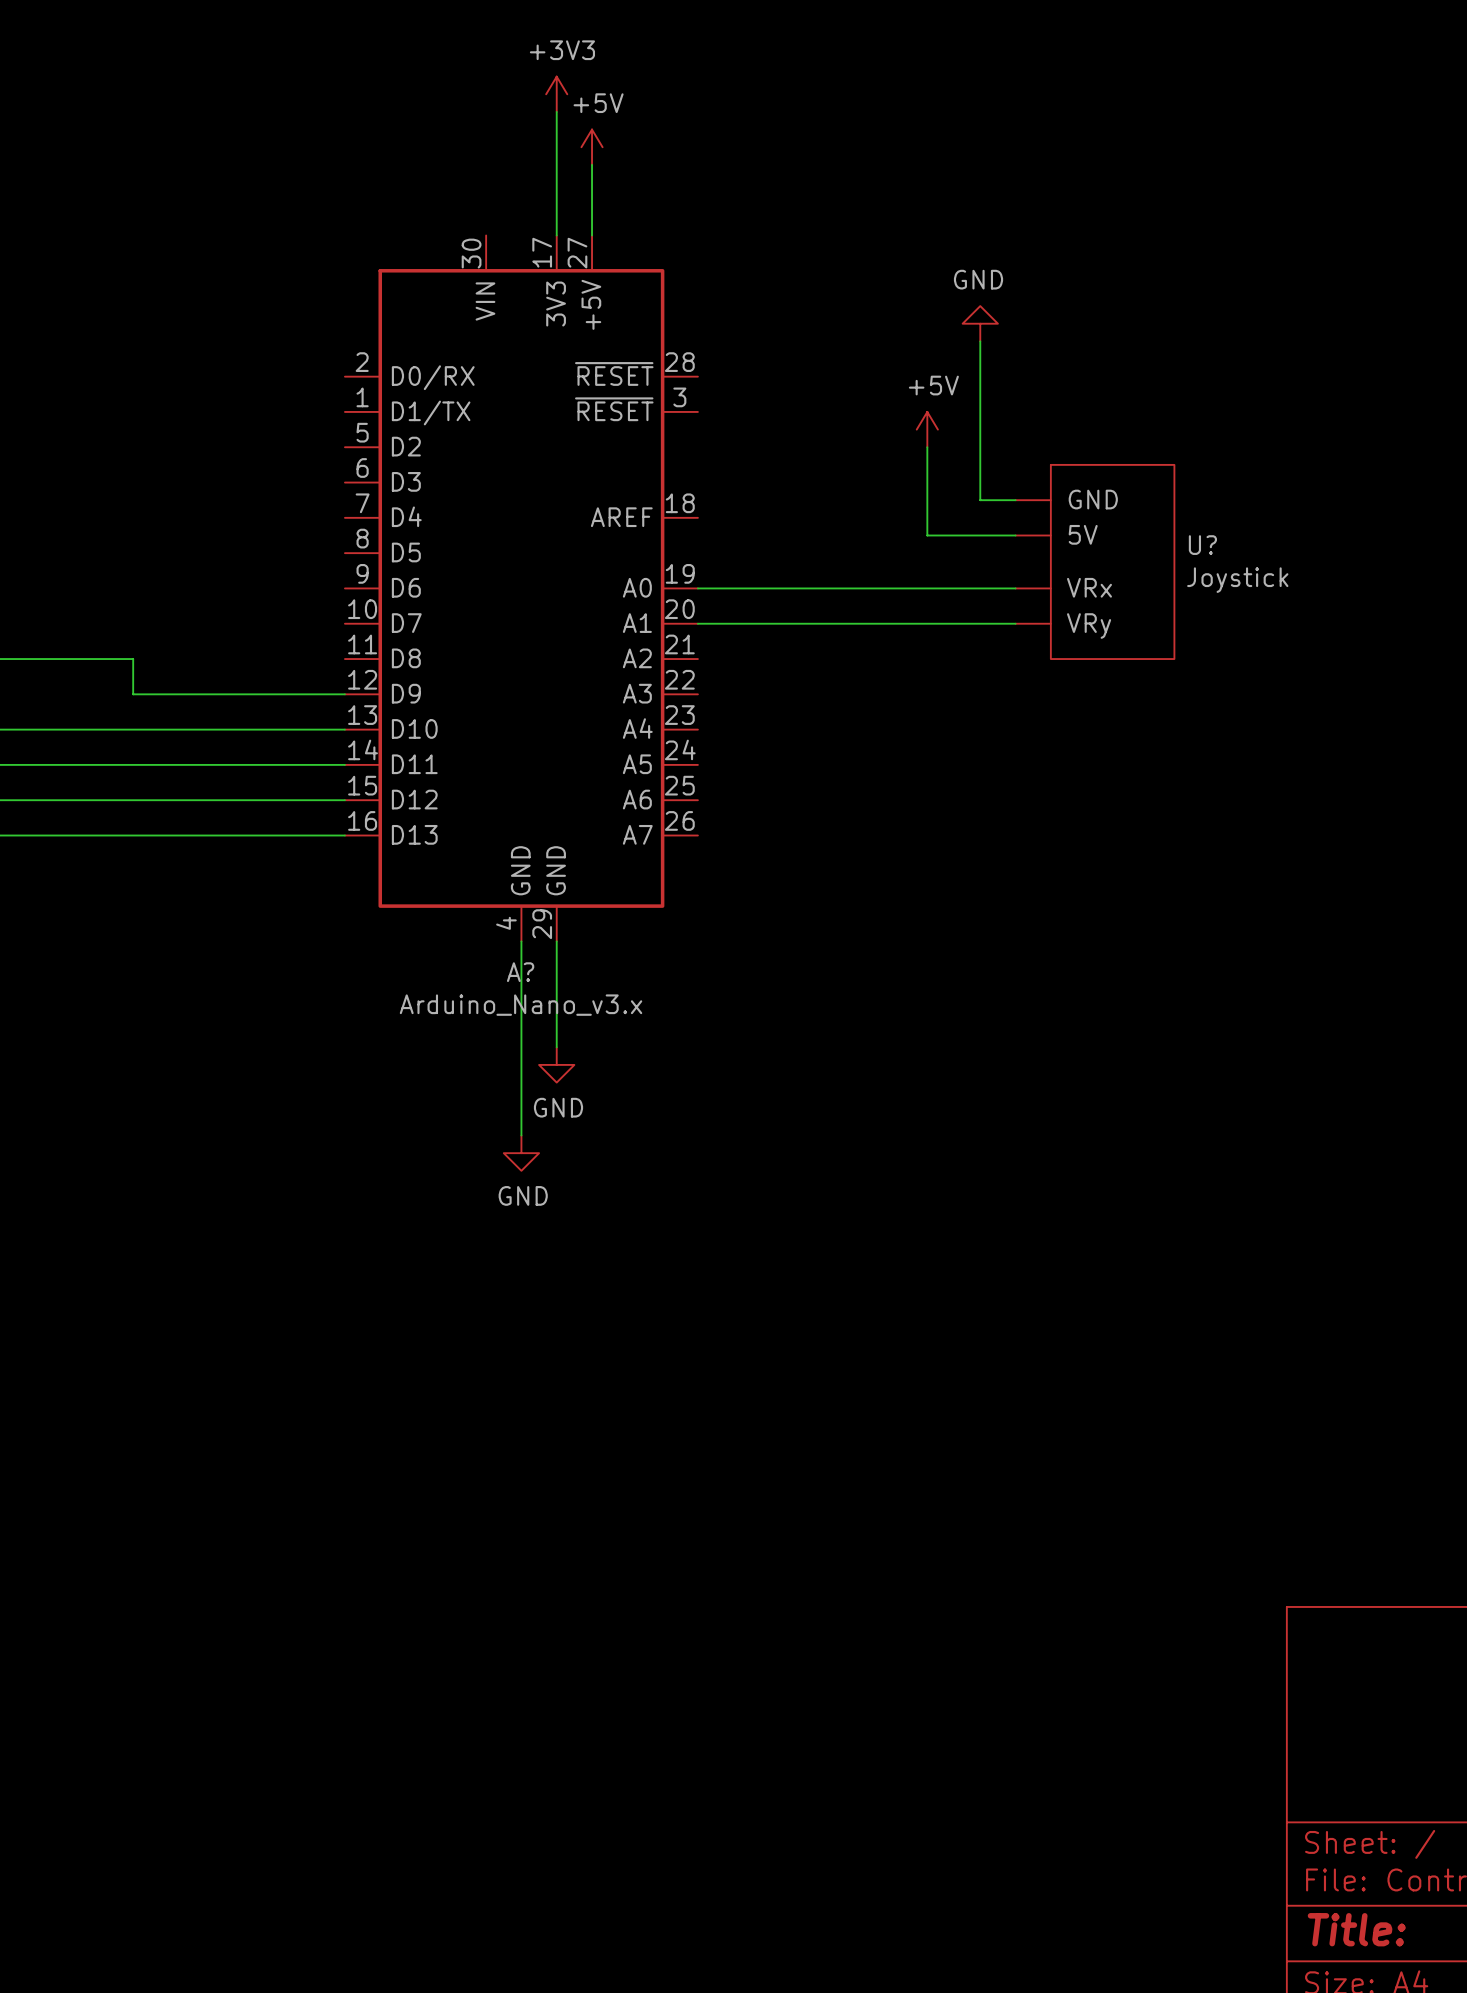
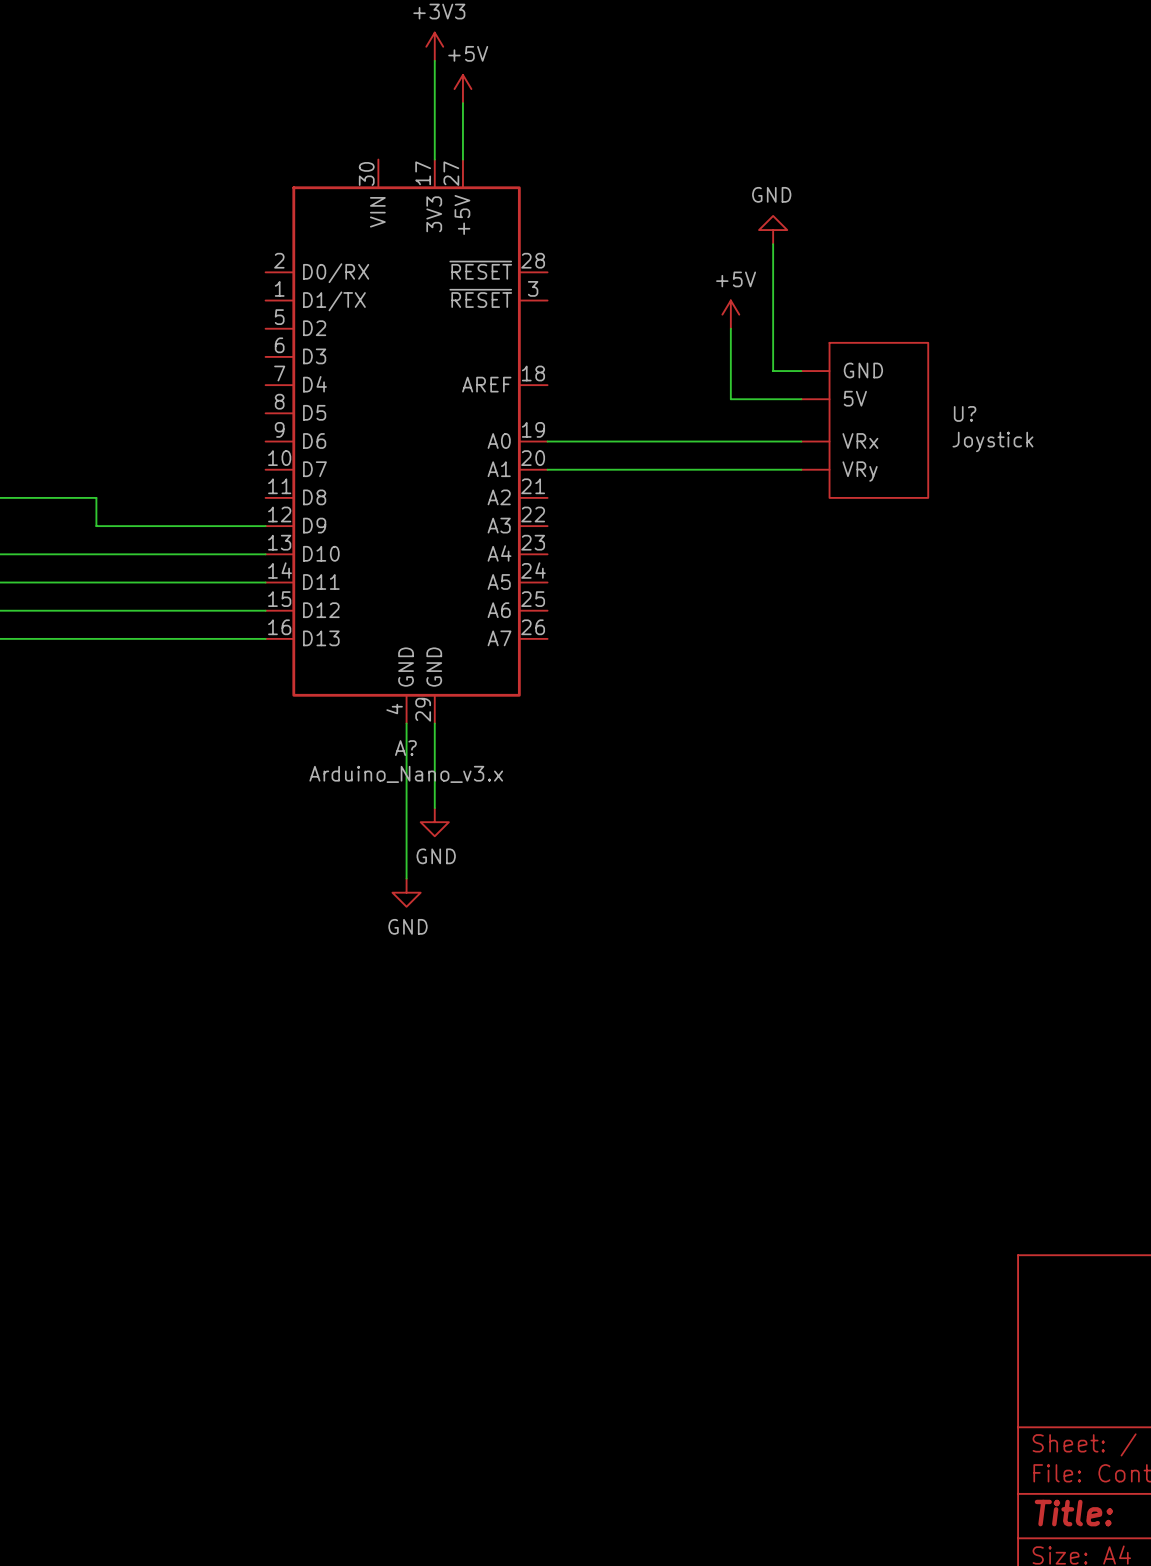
U? name position: U? (1202, 545) -> U? (965, 413)
U? value position: Joystick (1237, 580) -> Joystick (992, 441)

